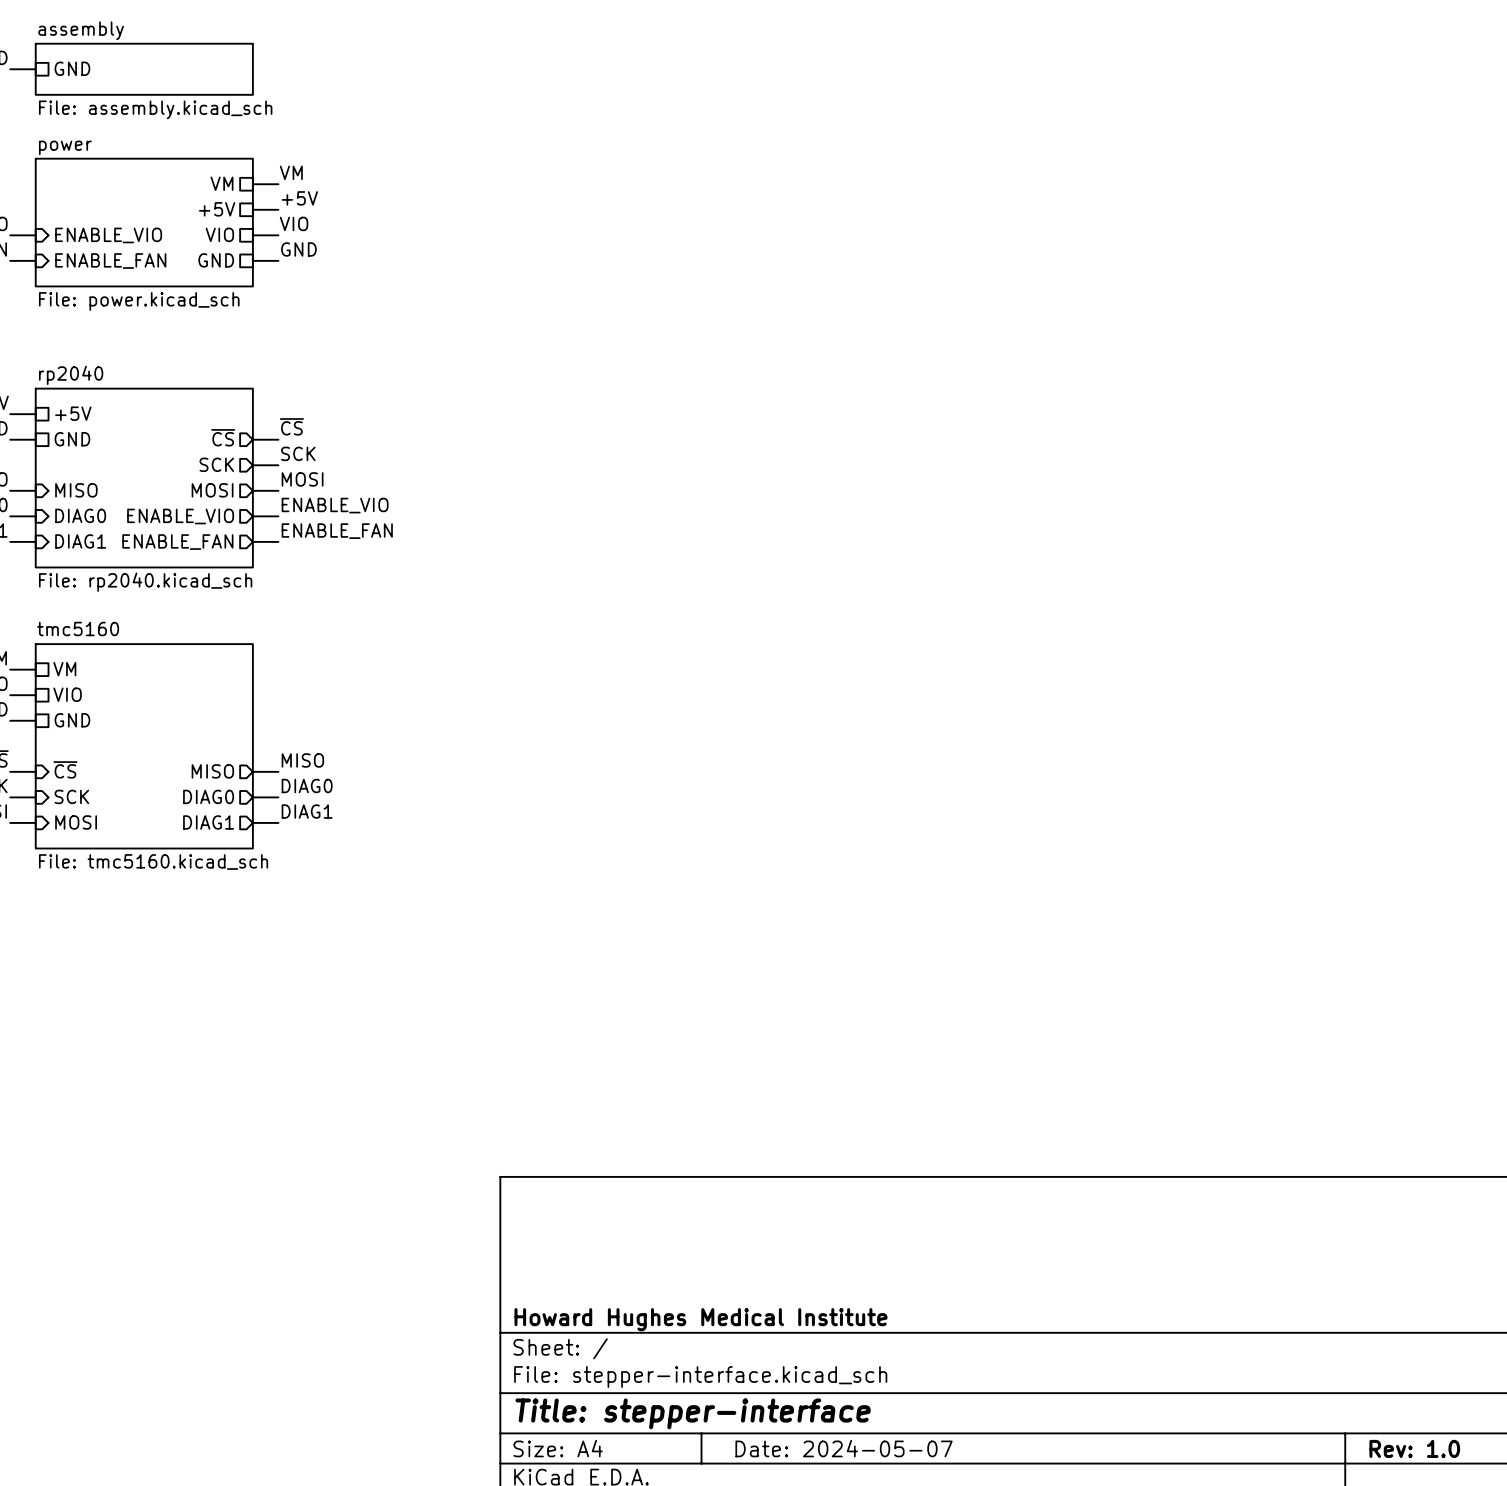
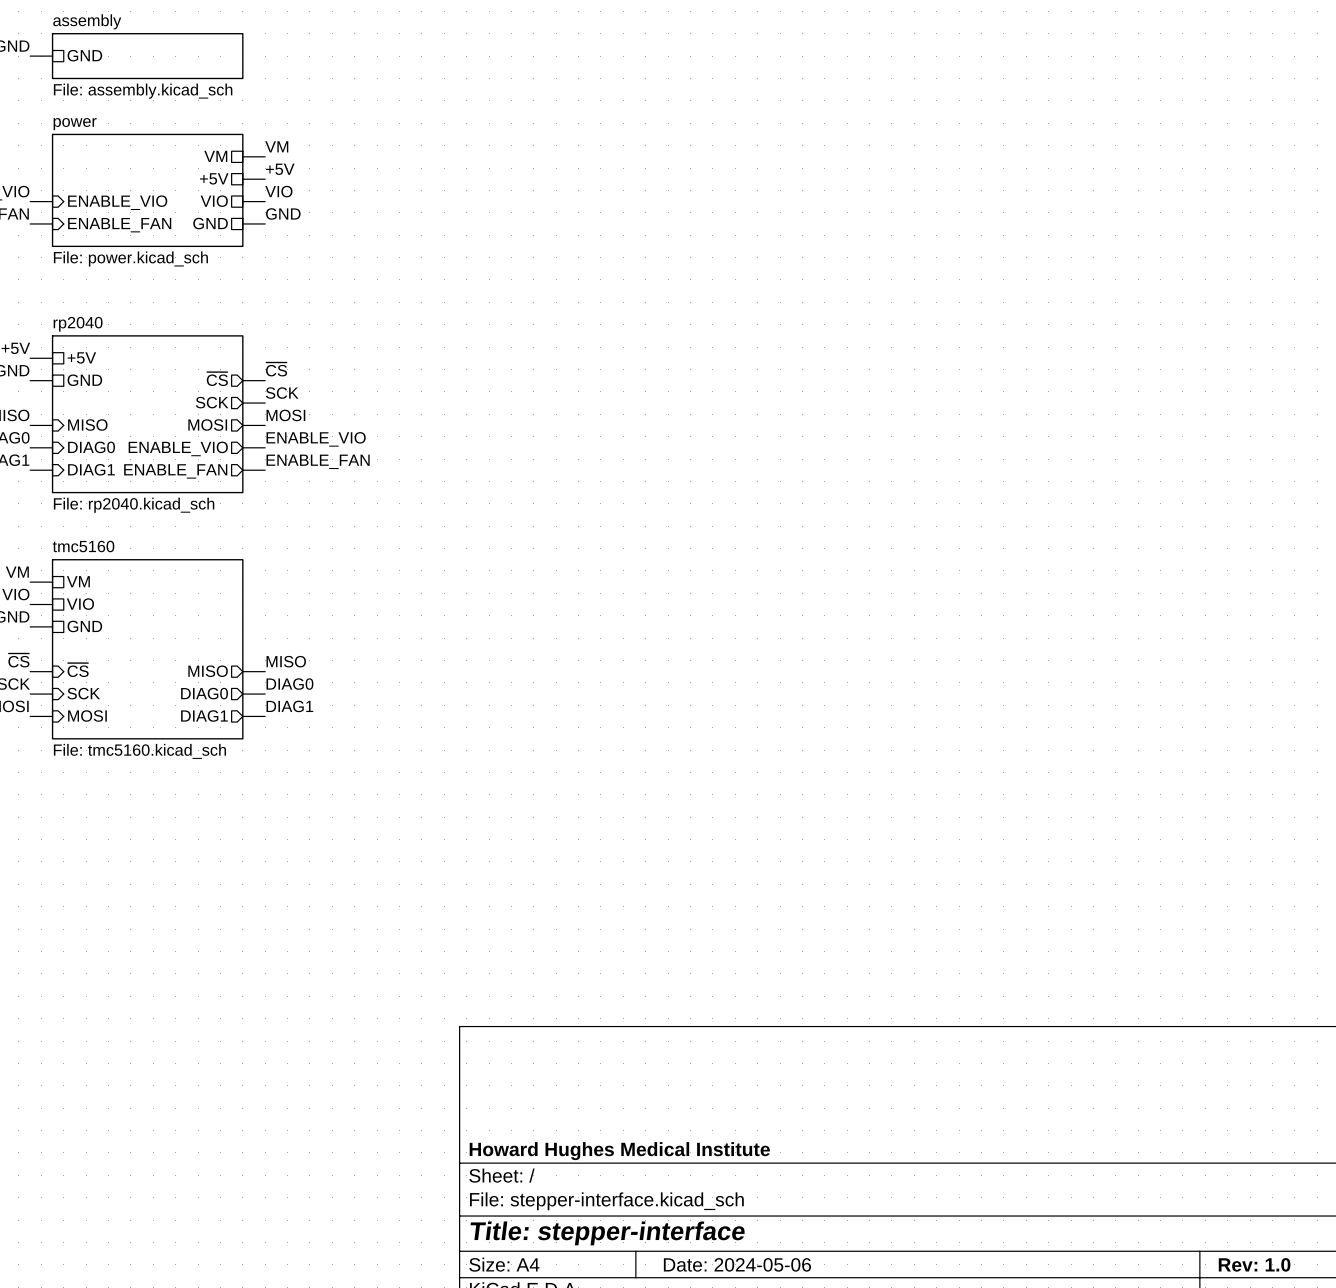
title block: Date: 2024-05-07 (844, 1448) -> Date: 2024-05-06 (737, 1264)

